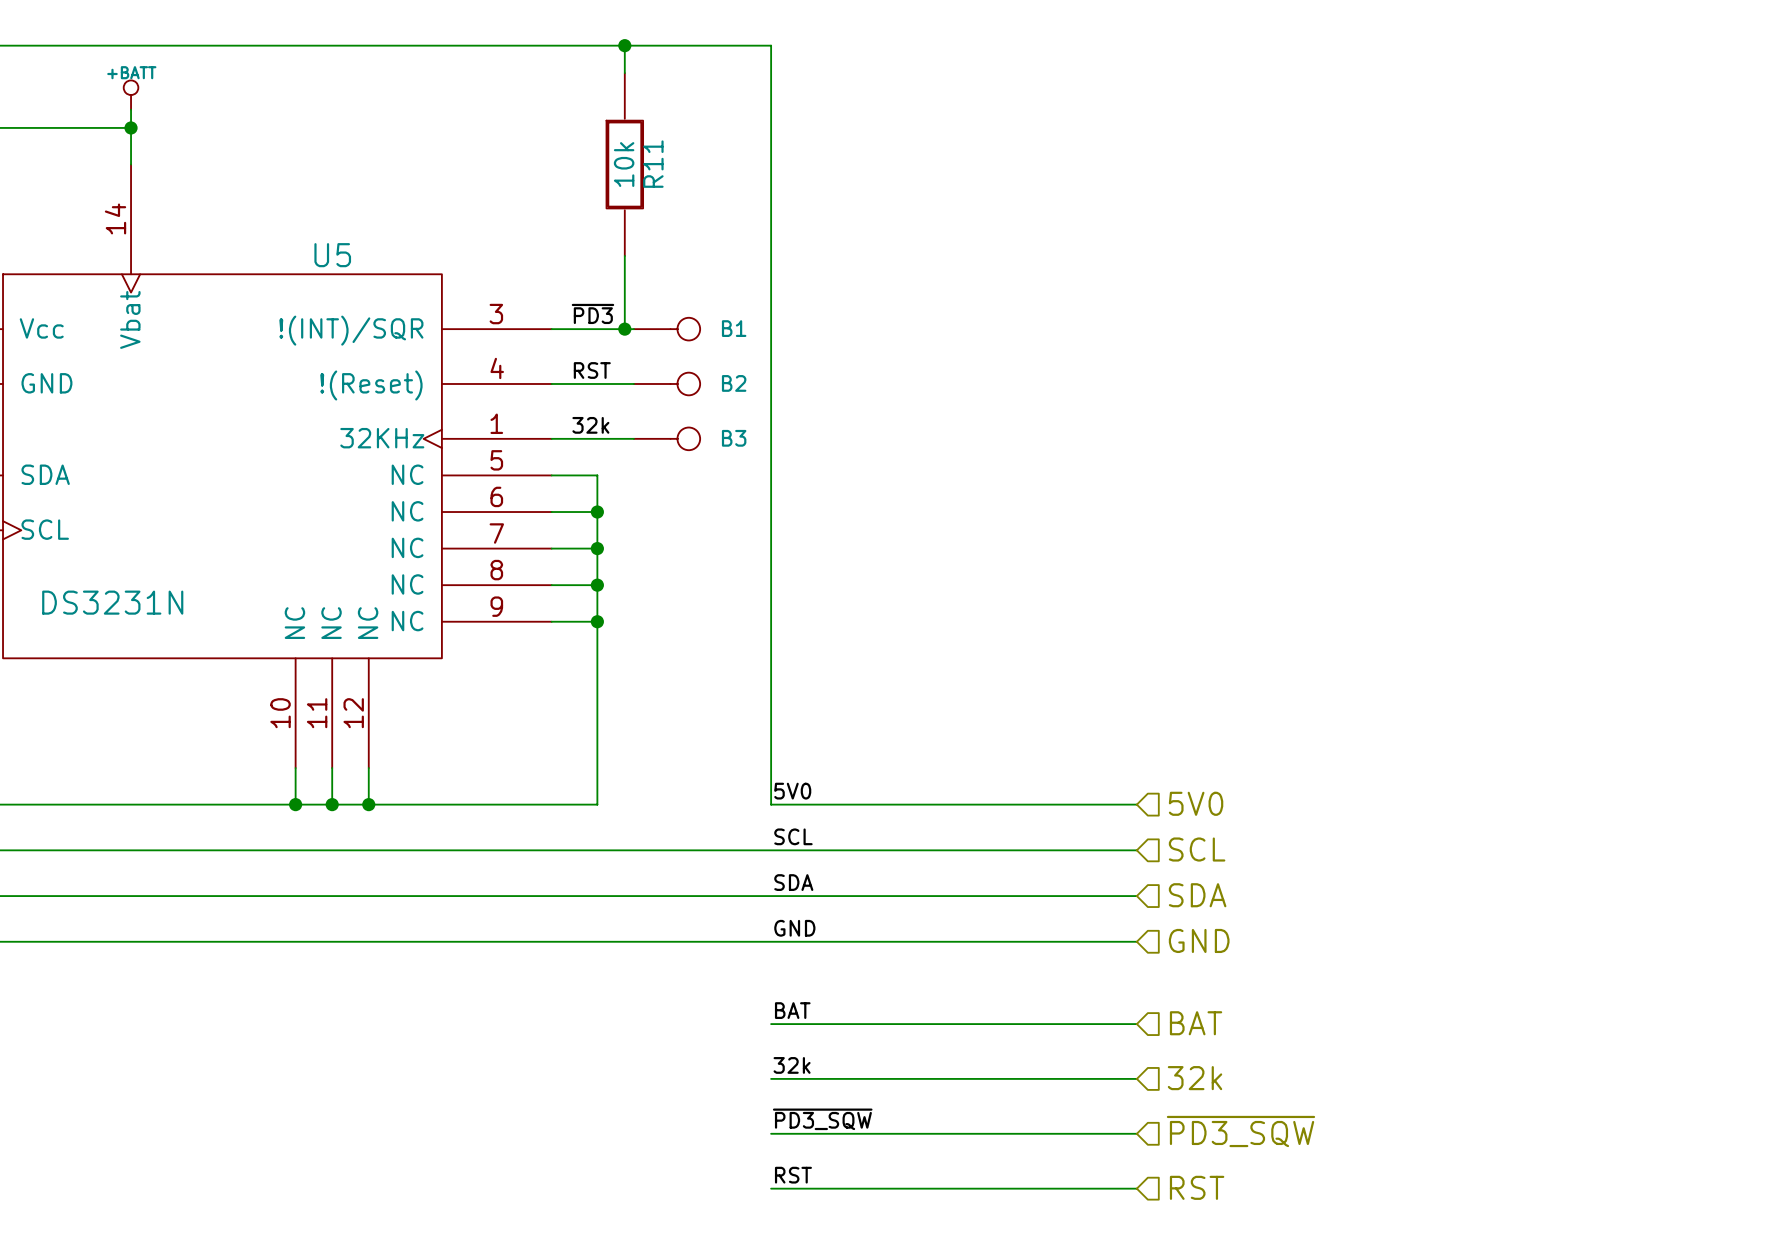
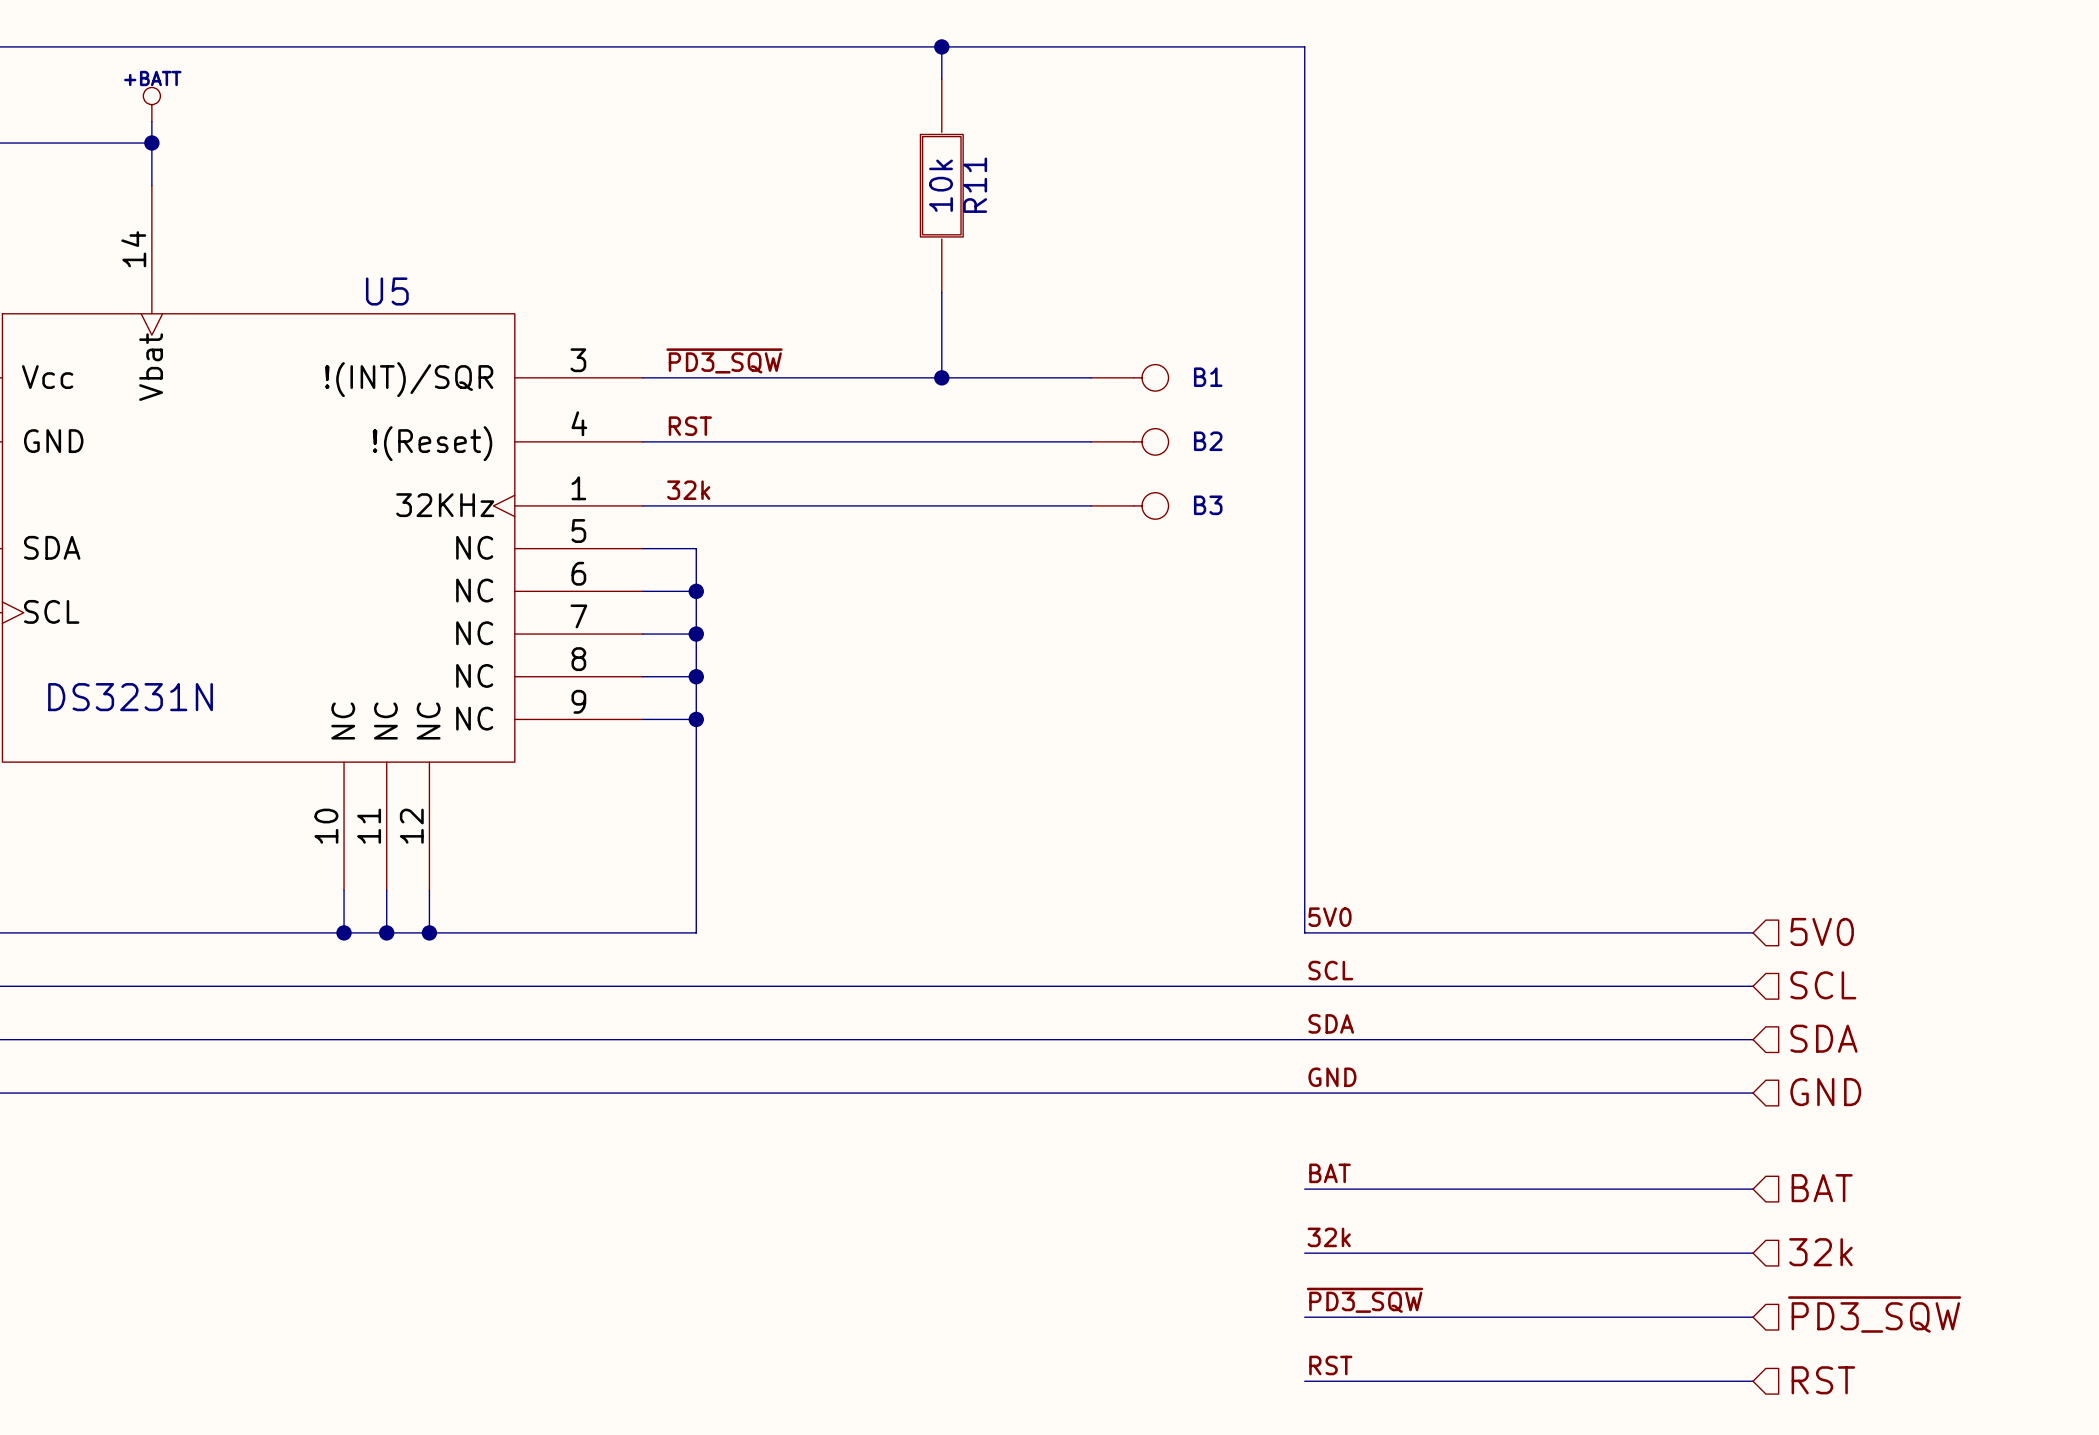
wire: (624, 45) (624, 73) -> (941, 46) (941, 78)
junction: (624, 45) -> none
wire: (771, 45) (771, 804) (1118, 804) -> (899, 46) (1304, 46) (1304, 932)
junction: none -> (941, 46)
R11 position: (624, 164) -> (941, 185)
wire: (624, 255) (624, 329) -> (941, 292) (941, 377)
label: ~{PD3} (592, 313) -> ~{PD3_SQW} (724, 360)
junction: (624, 329) -> none
wire: none -> (738, 377) (1091, 377)
B1 position: (667, 329) -> (1129, 377)
junction: none -> (941, 377)
wire: none -> (738, 441) (1091, 441)
B2 position: (667, 383) -> (1129, 441)
wire: none -> (738, 505) (1091, 505)
B3 position: (667, 438) -> (1129, 505)
label position: 5V0 (792, 791) -> 5V0 (1330, 917)
hierarchical label: 5V0 (1196, 803) -> none
hierarchical label: none -> 5V0 (1822, 931)
wire: none -> (1326, 932) (1753, 932)
label position: SCL (793, 836) -> SCL (1330, 970)
hierarchical label: SCL (1197, 849) -> none
hierarchical label: none -> SCL (1823, 985)
wire: none -> (1326, 986) (1753, 986)
label position: SDA (793, 882) -> SDA (1331, 1023)
hierarchical label: SDA (1197, 895) -> none
hierarchical label: none -> SDA (1823, 1038)
wire: none -> (1326, 1039) (1753, 1039)
label position: GND (794, 928) -> GND (1332, 1077)
hierarchical label: GND (1199, 940) -> none
hierarchical label: none -> GND (1825, 1092)
wire: none -> (1326, 1093) (1753, 1093)
label position: BAT (792, 1010) -> BAT (1330, 1173)
hierarchical label: BAT (1196, 1023) -> none
hierarchical label: none -> BAT (1822, 1188)
wire: (771, 1024) (1118, 1024) -> none
wire: none -> (1326, 1189) (1753, 1189)
label position: 32k (792, 1065) -> 32k (1329, 1237)
wire: (771, 1078) (1118, 1078) -> none
wire: none -> (1326, 1253) (1753, 1253)
hierarchical label: 32k (1195, 1078) -> none
hierarchical label: none -> 32k (1820, 1252)
label position: ~{PD3_SQW} (822, 1119) -> ~{PD3_SQW} (1364, 1300)
hierarchical label: ~{PD3_SQW} (1240, 1131) -> none
hierarchical label: none -> ~{PD3_SQW} (1874, 1314)
wire: (771, 1133) (1118, 1133) -> none
wire: none -> (1326, 1317) (1753, 1317)
label position: RST (793, 1175) -> RST (1330, 1365)
hierarchical label: RST (1197, 1187) -> none
hierarchical label: none -> RST (1823, 1380)
wire: (771, 1188) (1118, 1188) -> none
wire: none -> (1326, 1381) (1753, 1381)

